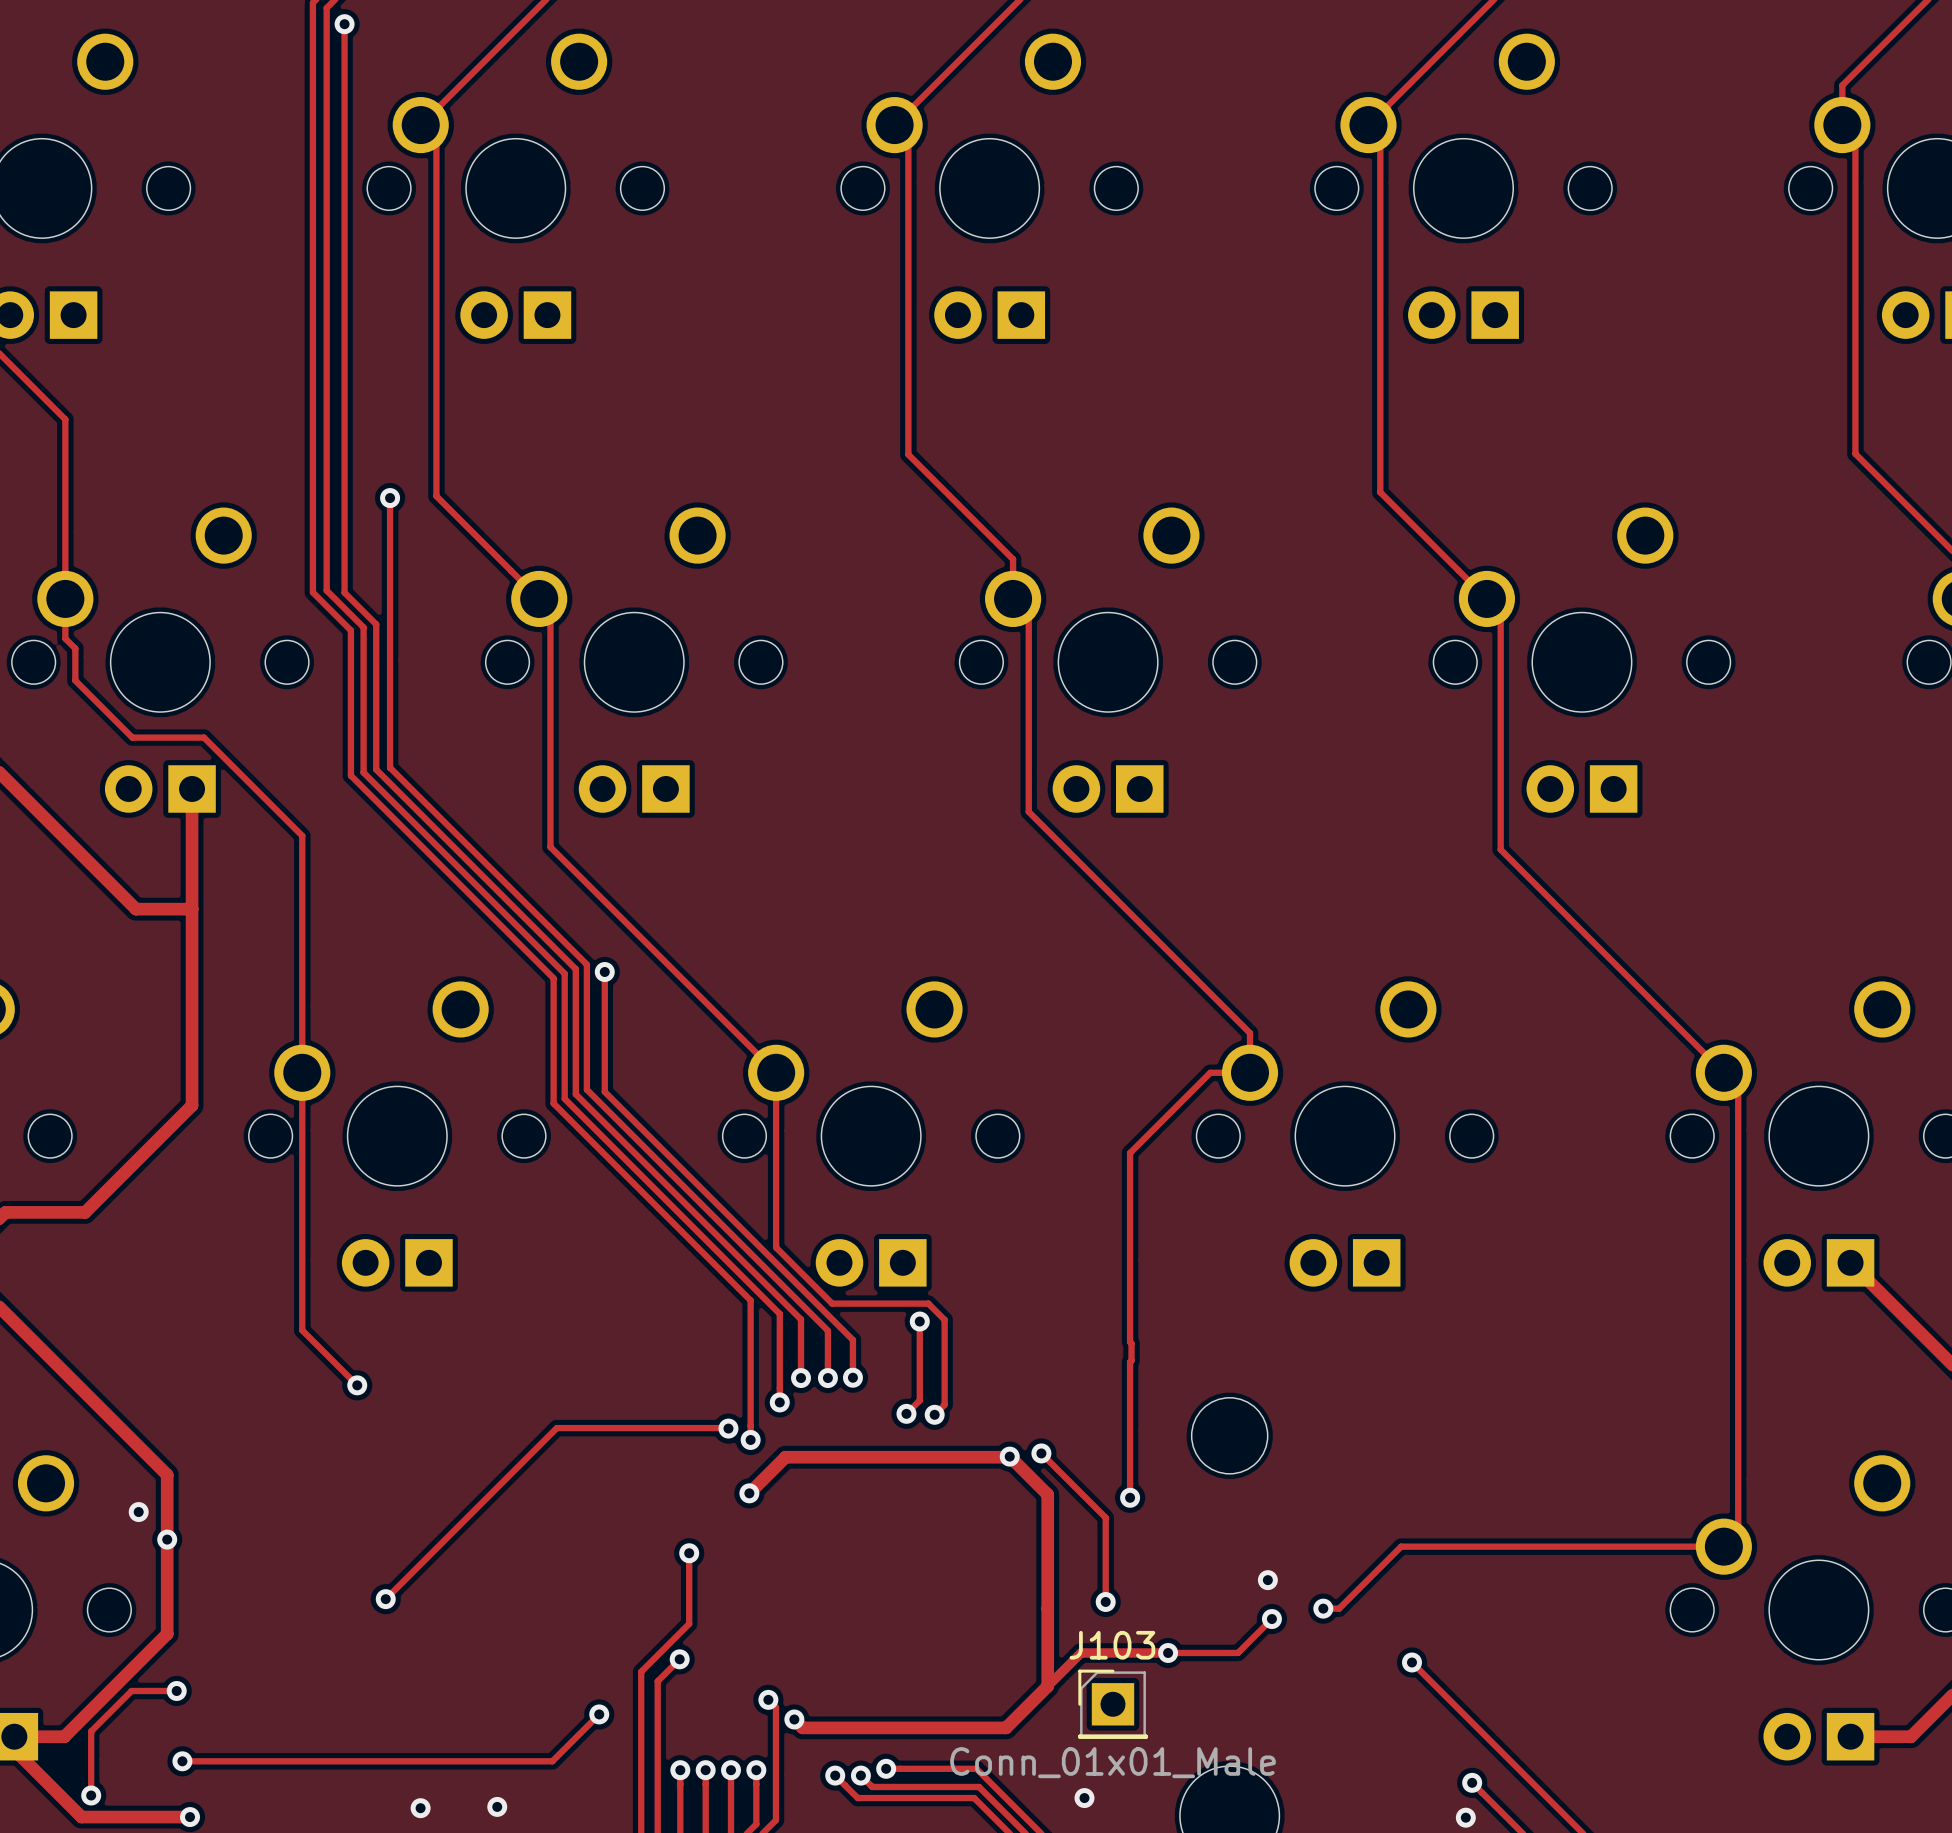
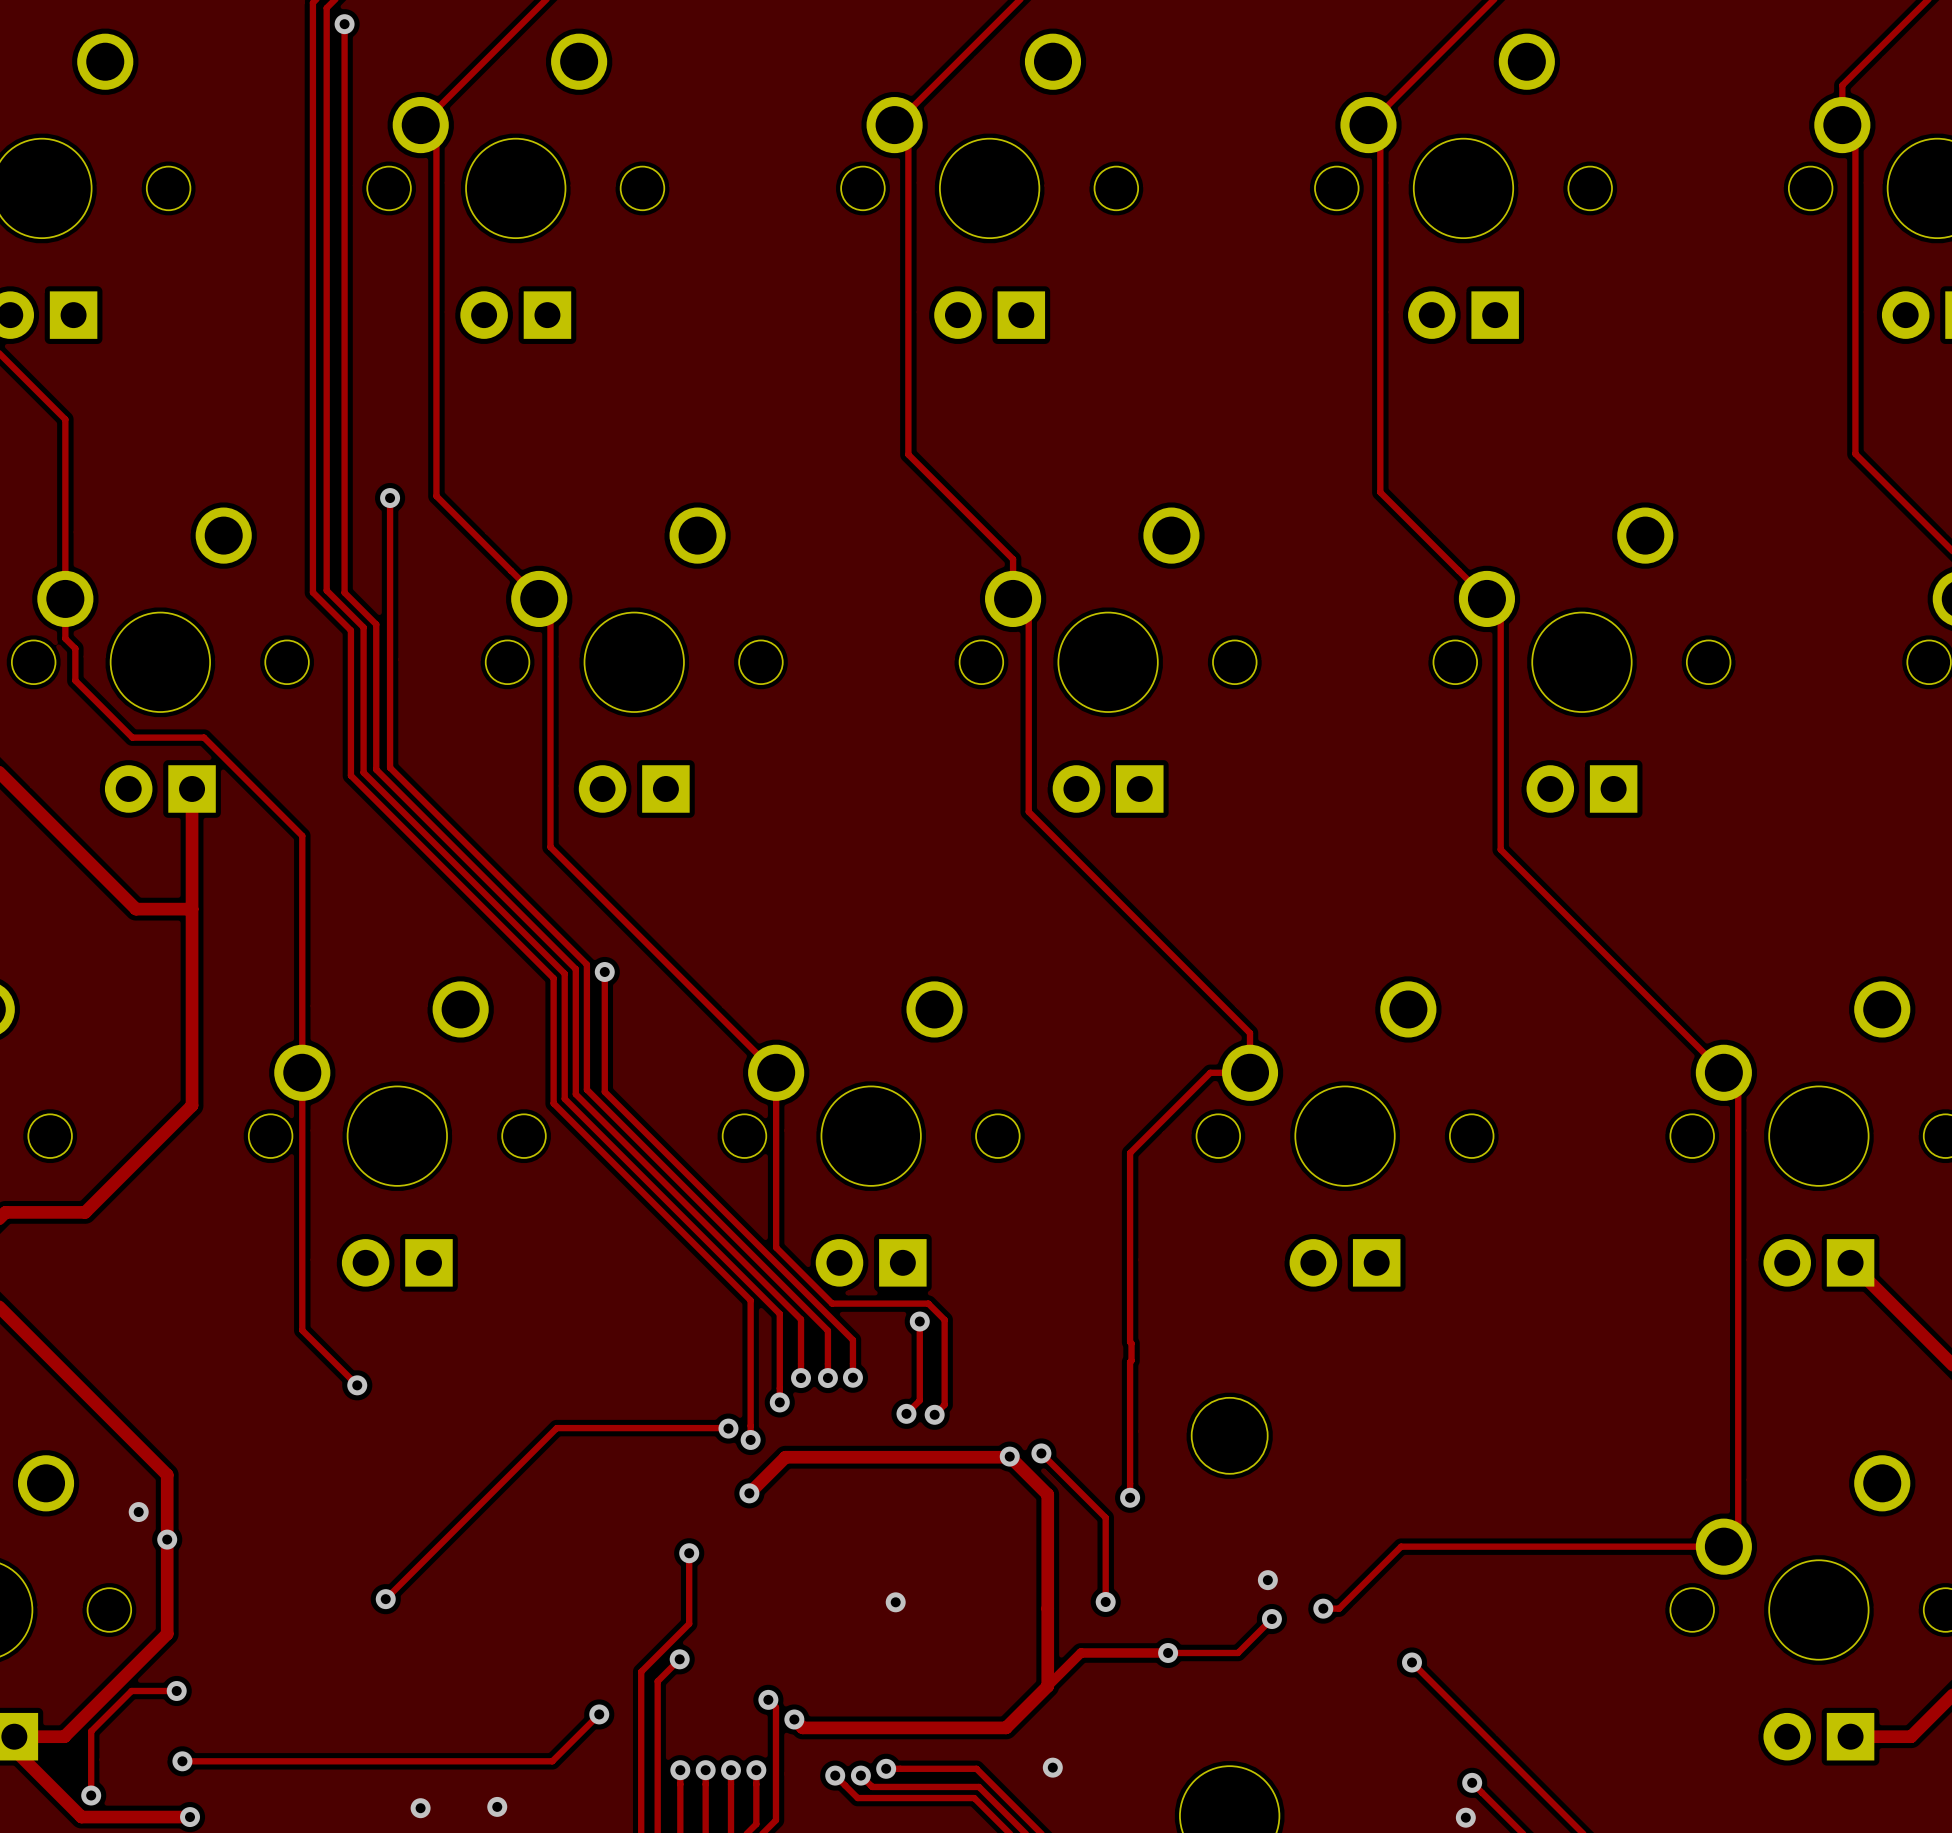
via: none -> (895, 1602)
J103: Conn_01x01_Male (1112, 1704) -> none
via position: (1084, 1798) -> (1052, 1767)

